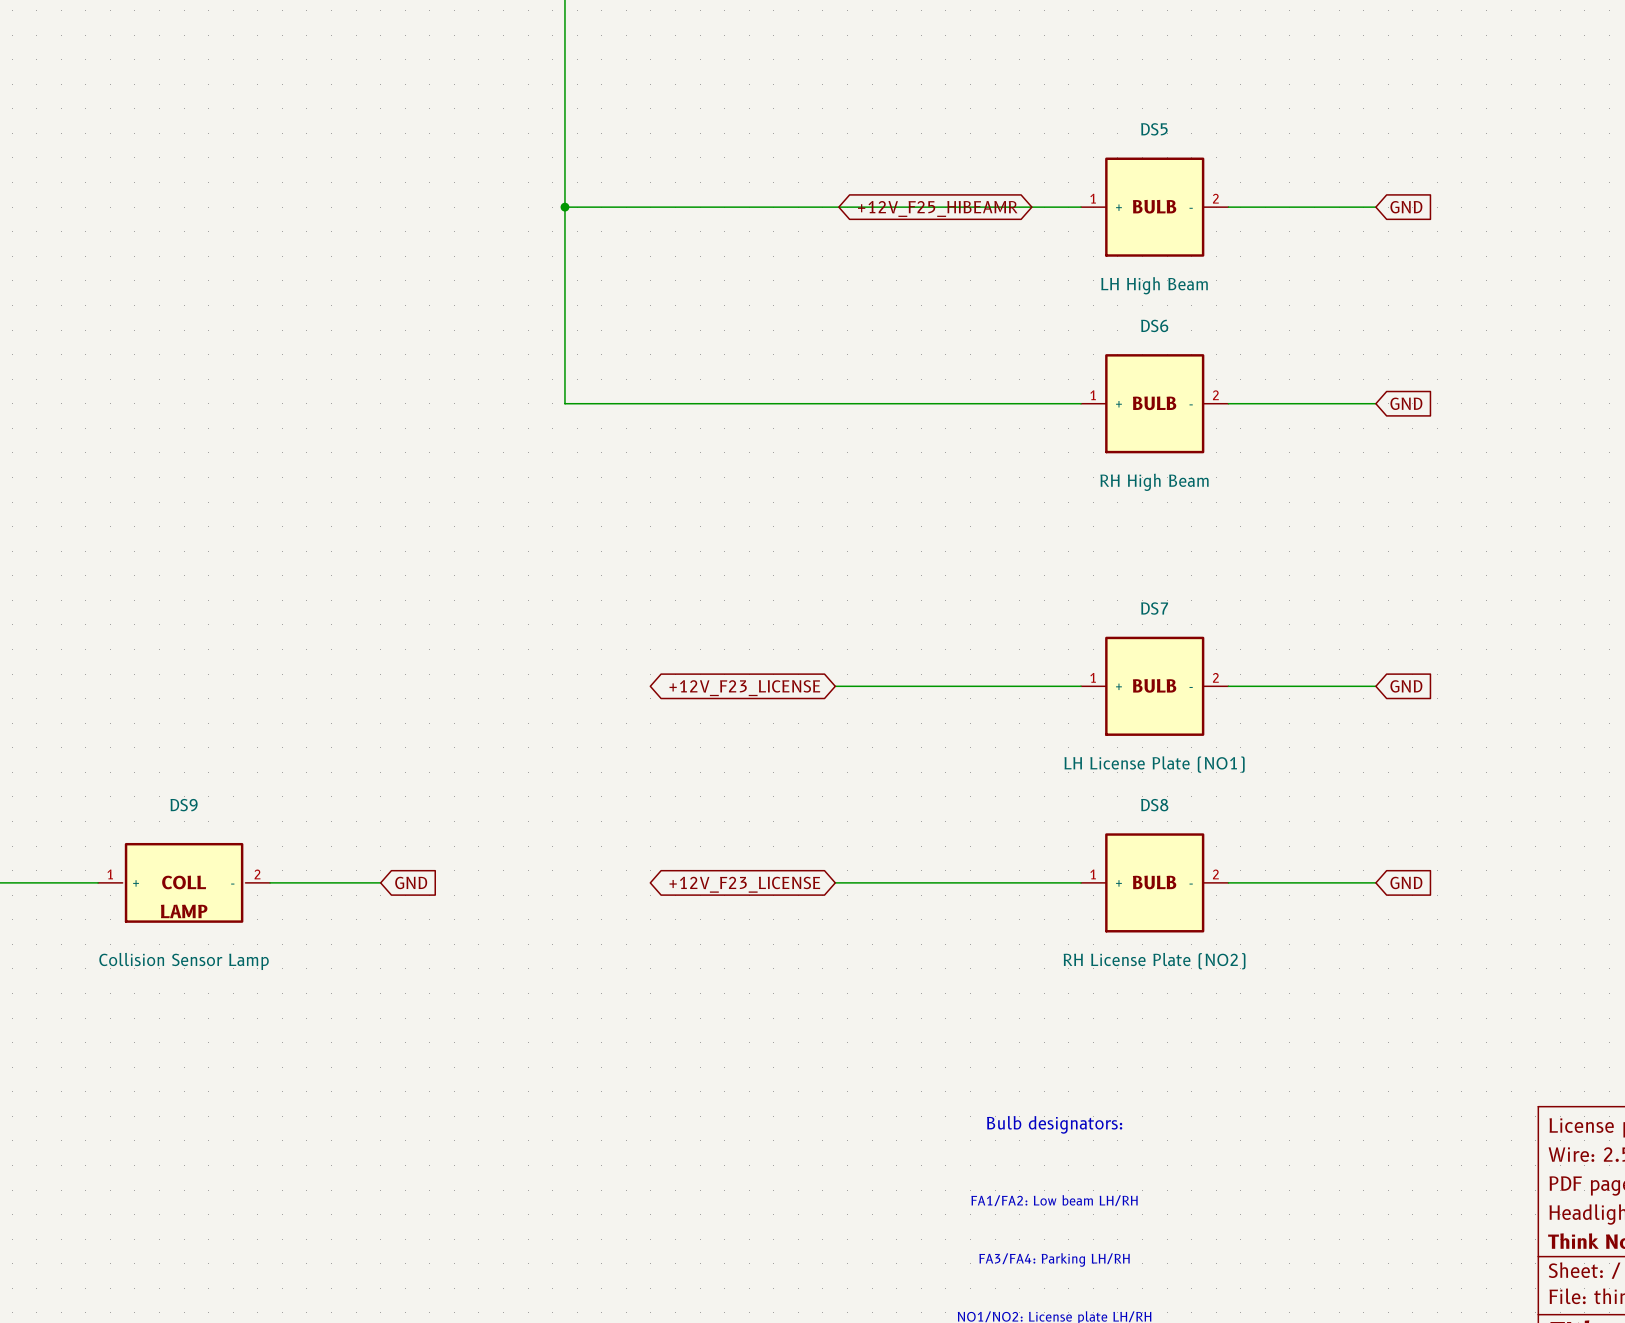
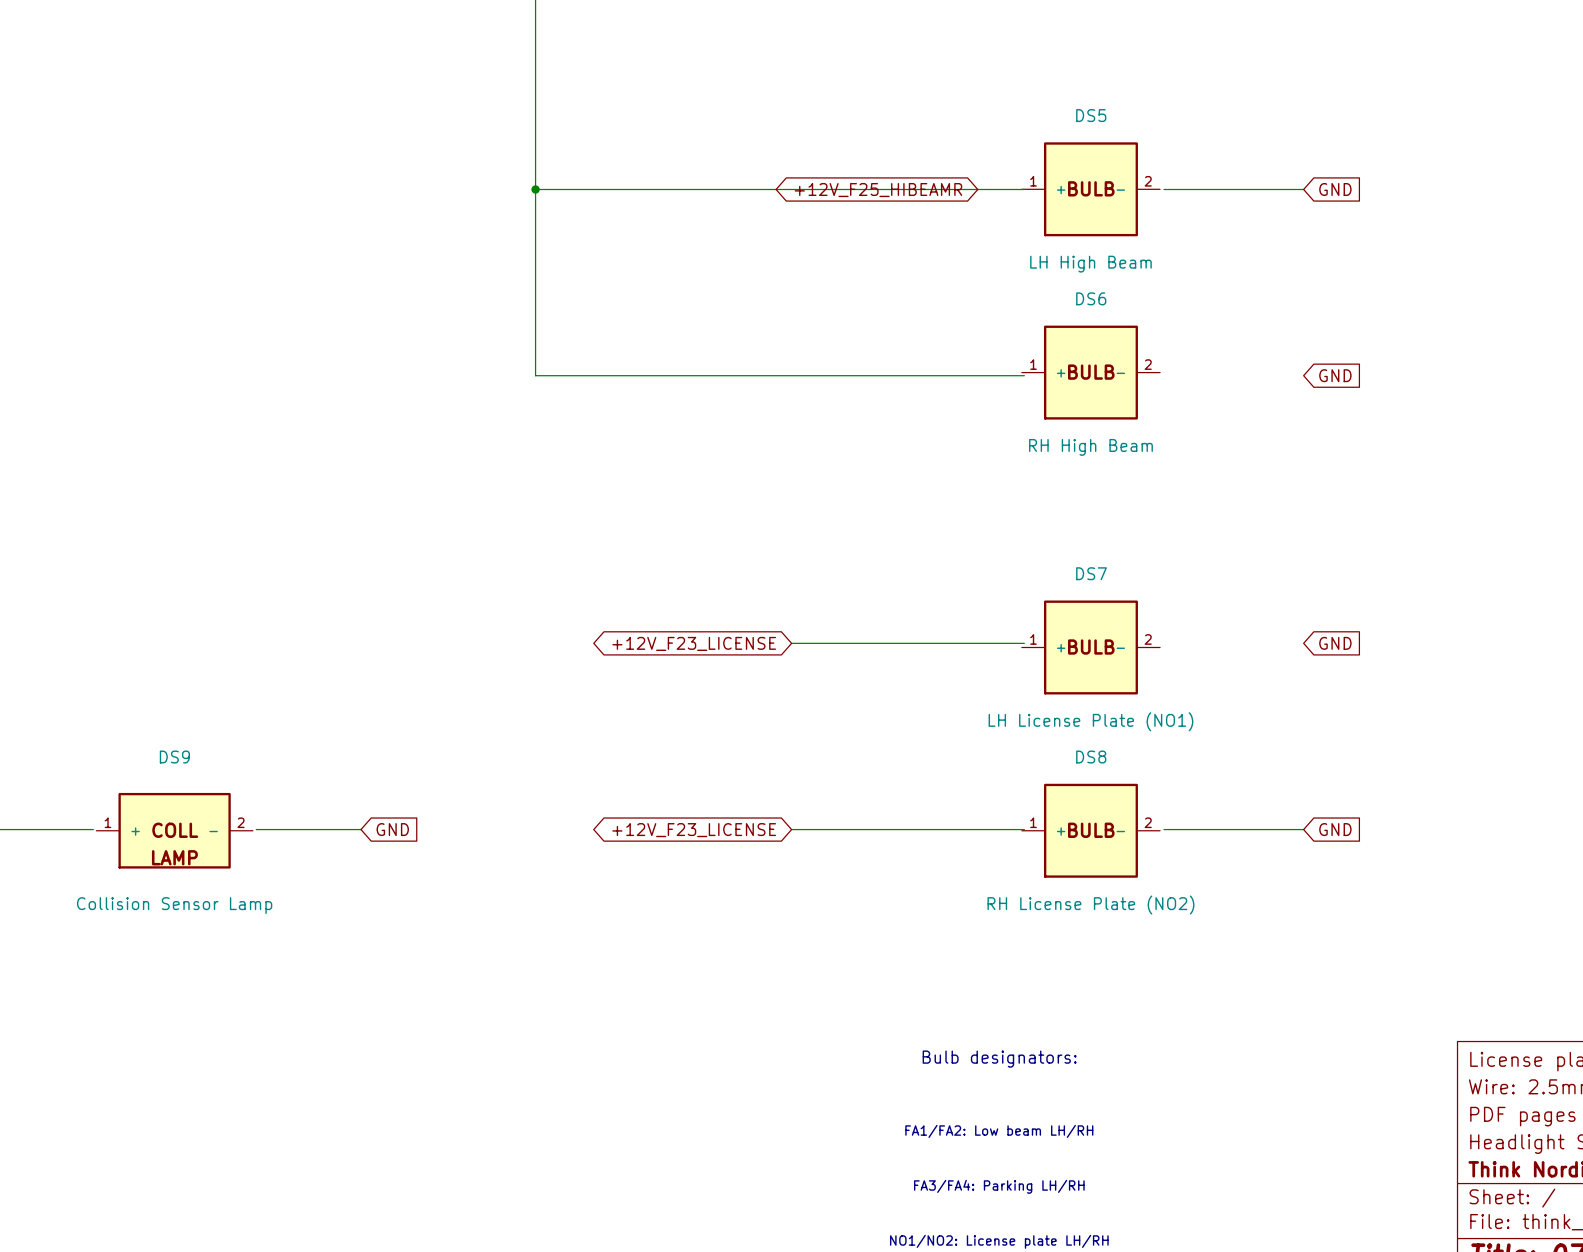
DS5 symbol: [1081, 157, 1229, 257] -> [1021, 142, 1161, 237]
DS6 symbol: [1081, 354, 1229, 454] -> [1021, 325, 1161, 420]
wire: (1228, 403) (1375, 403) -> none
DS7 symbol: [1081, 636, 1229, 736] -> [1021, 600, 1161, 695]
wire: (1228, 686) (1375, 686) -> none
DS8 symbol: [1081, 833, 1229, 933] -> [1021, 783, 1161, 878]
DS9 symbol: [98, 842, 271, 923] -> [96, 792, 253, 869]

